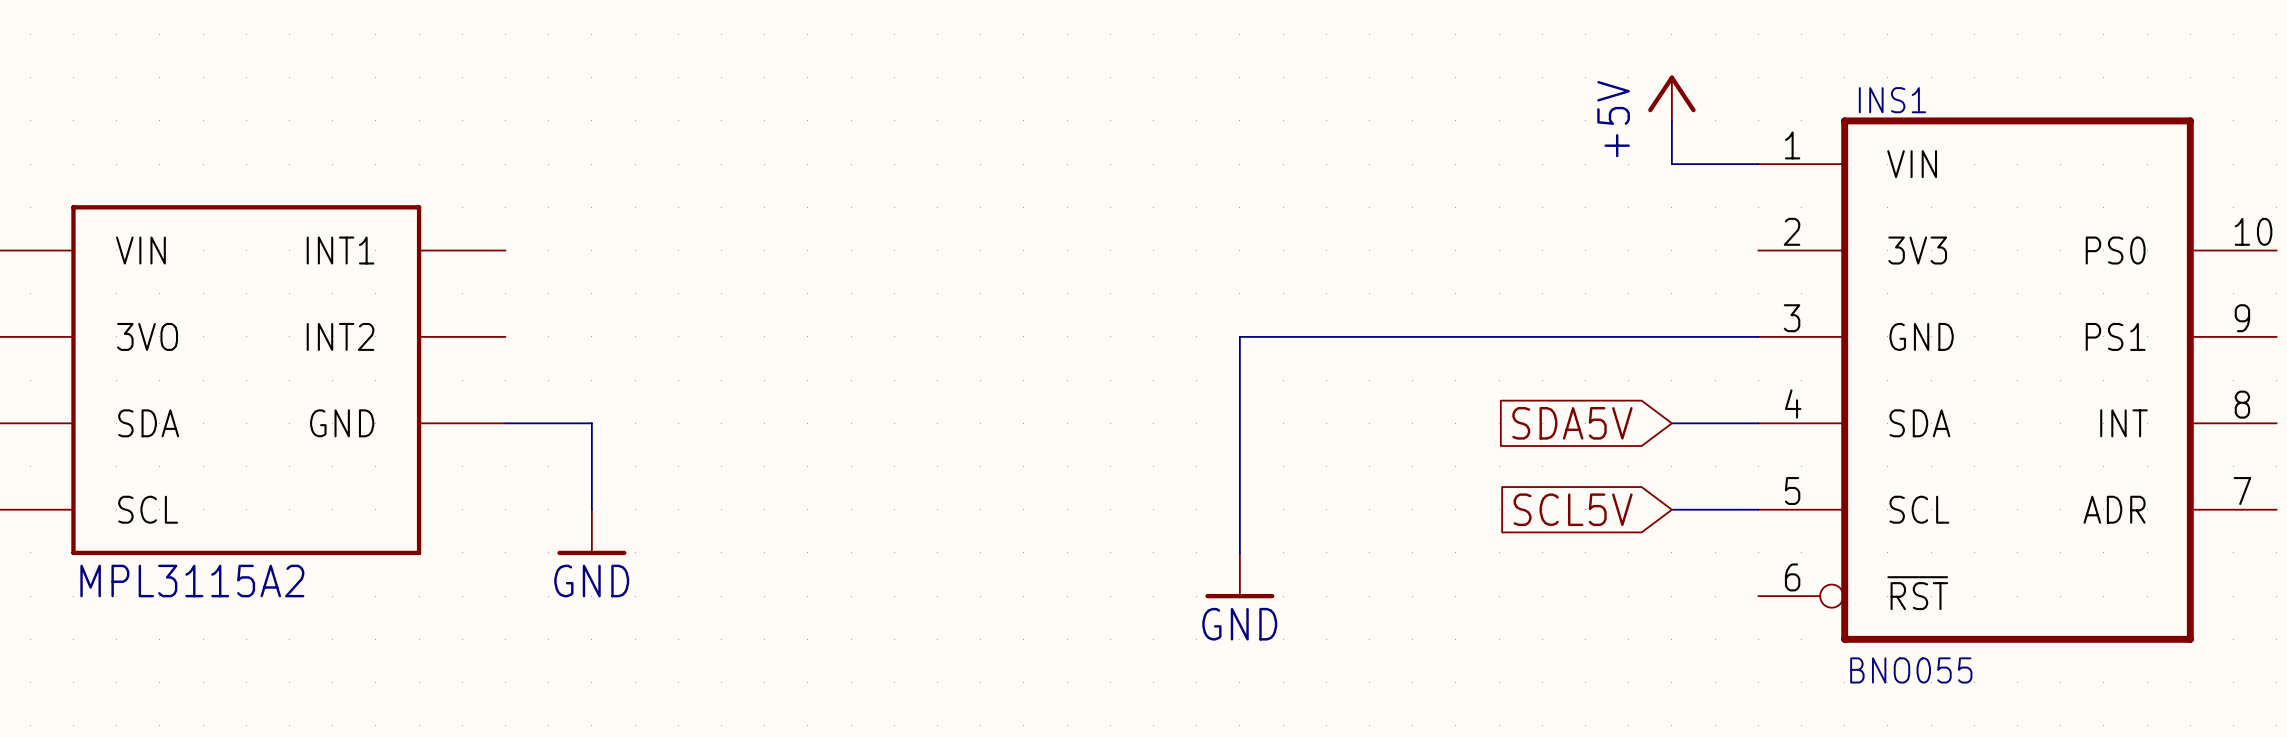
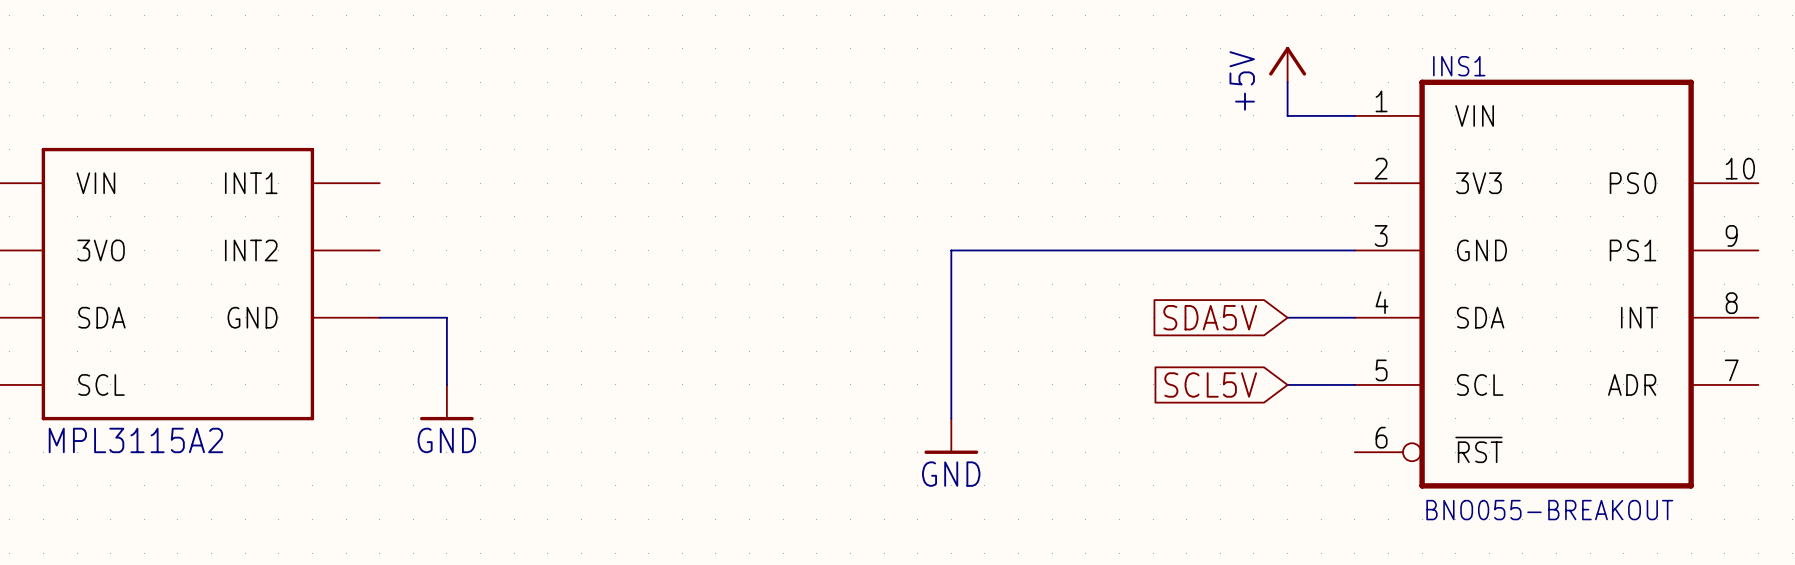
INS1 value: BNO055 (1911, 670) -> BNO055-BREAKOUT (1549, 510)

